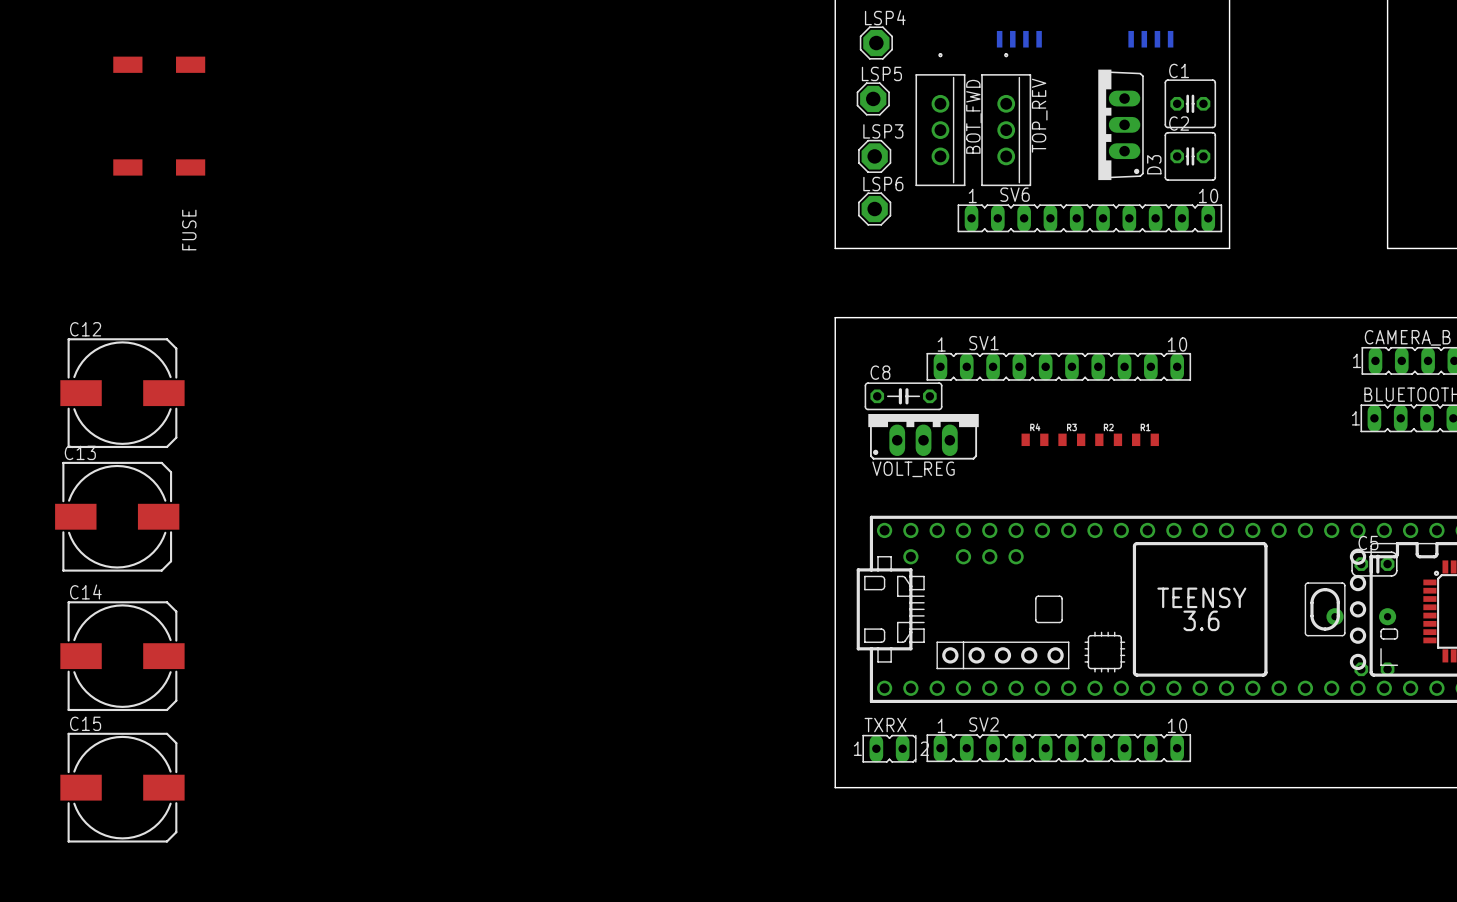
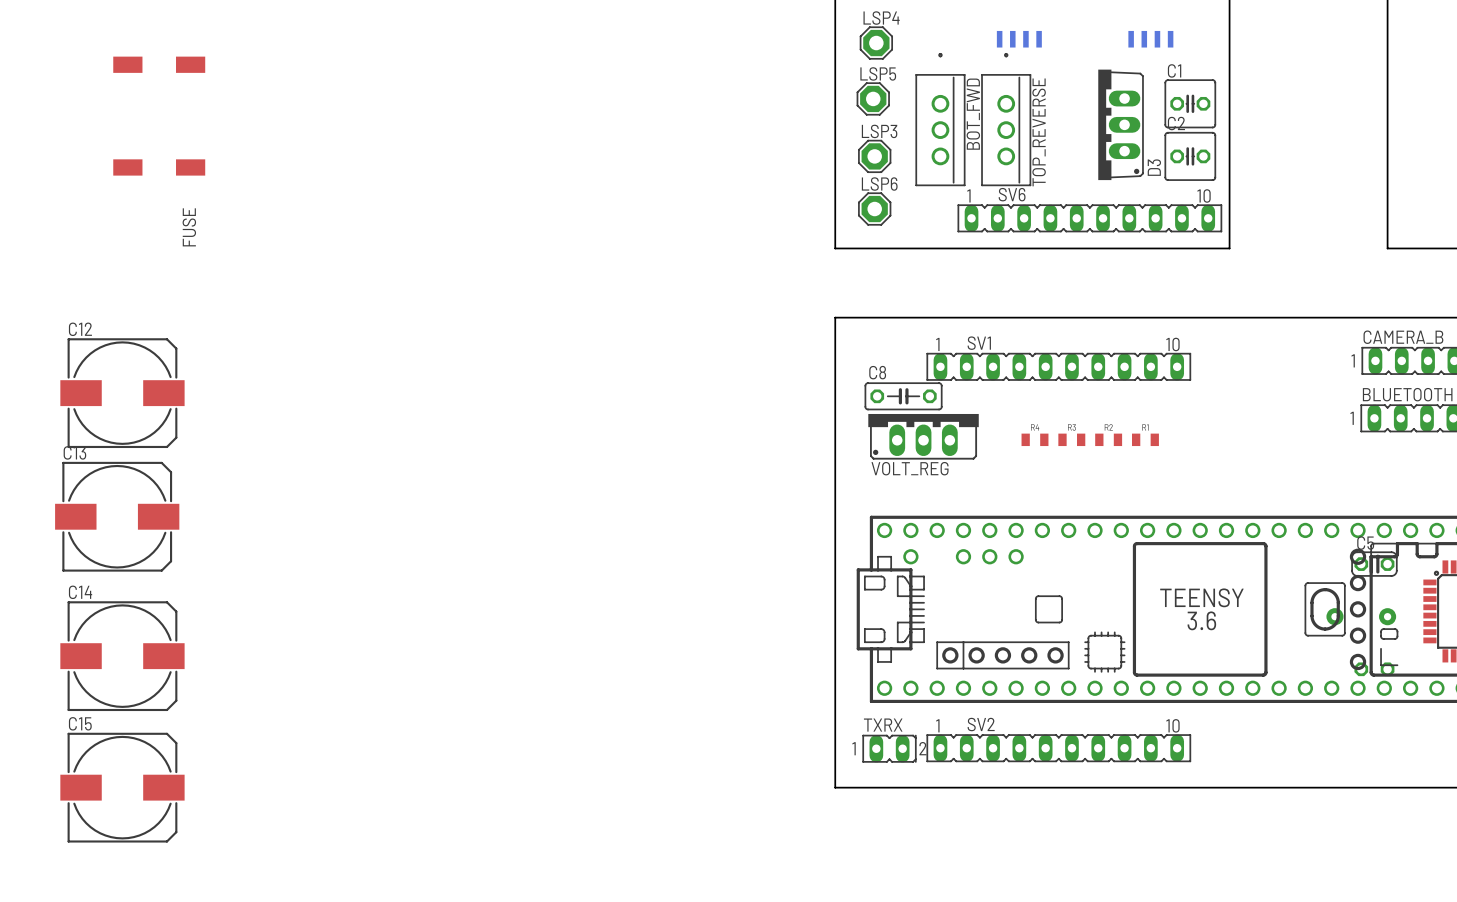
TOP_REV name: TOP_REV (1039, 115) -> TOP_REVERSE (1039, 132)

